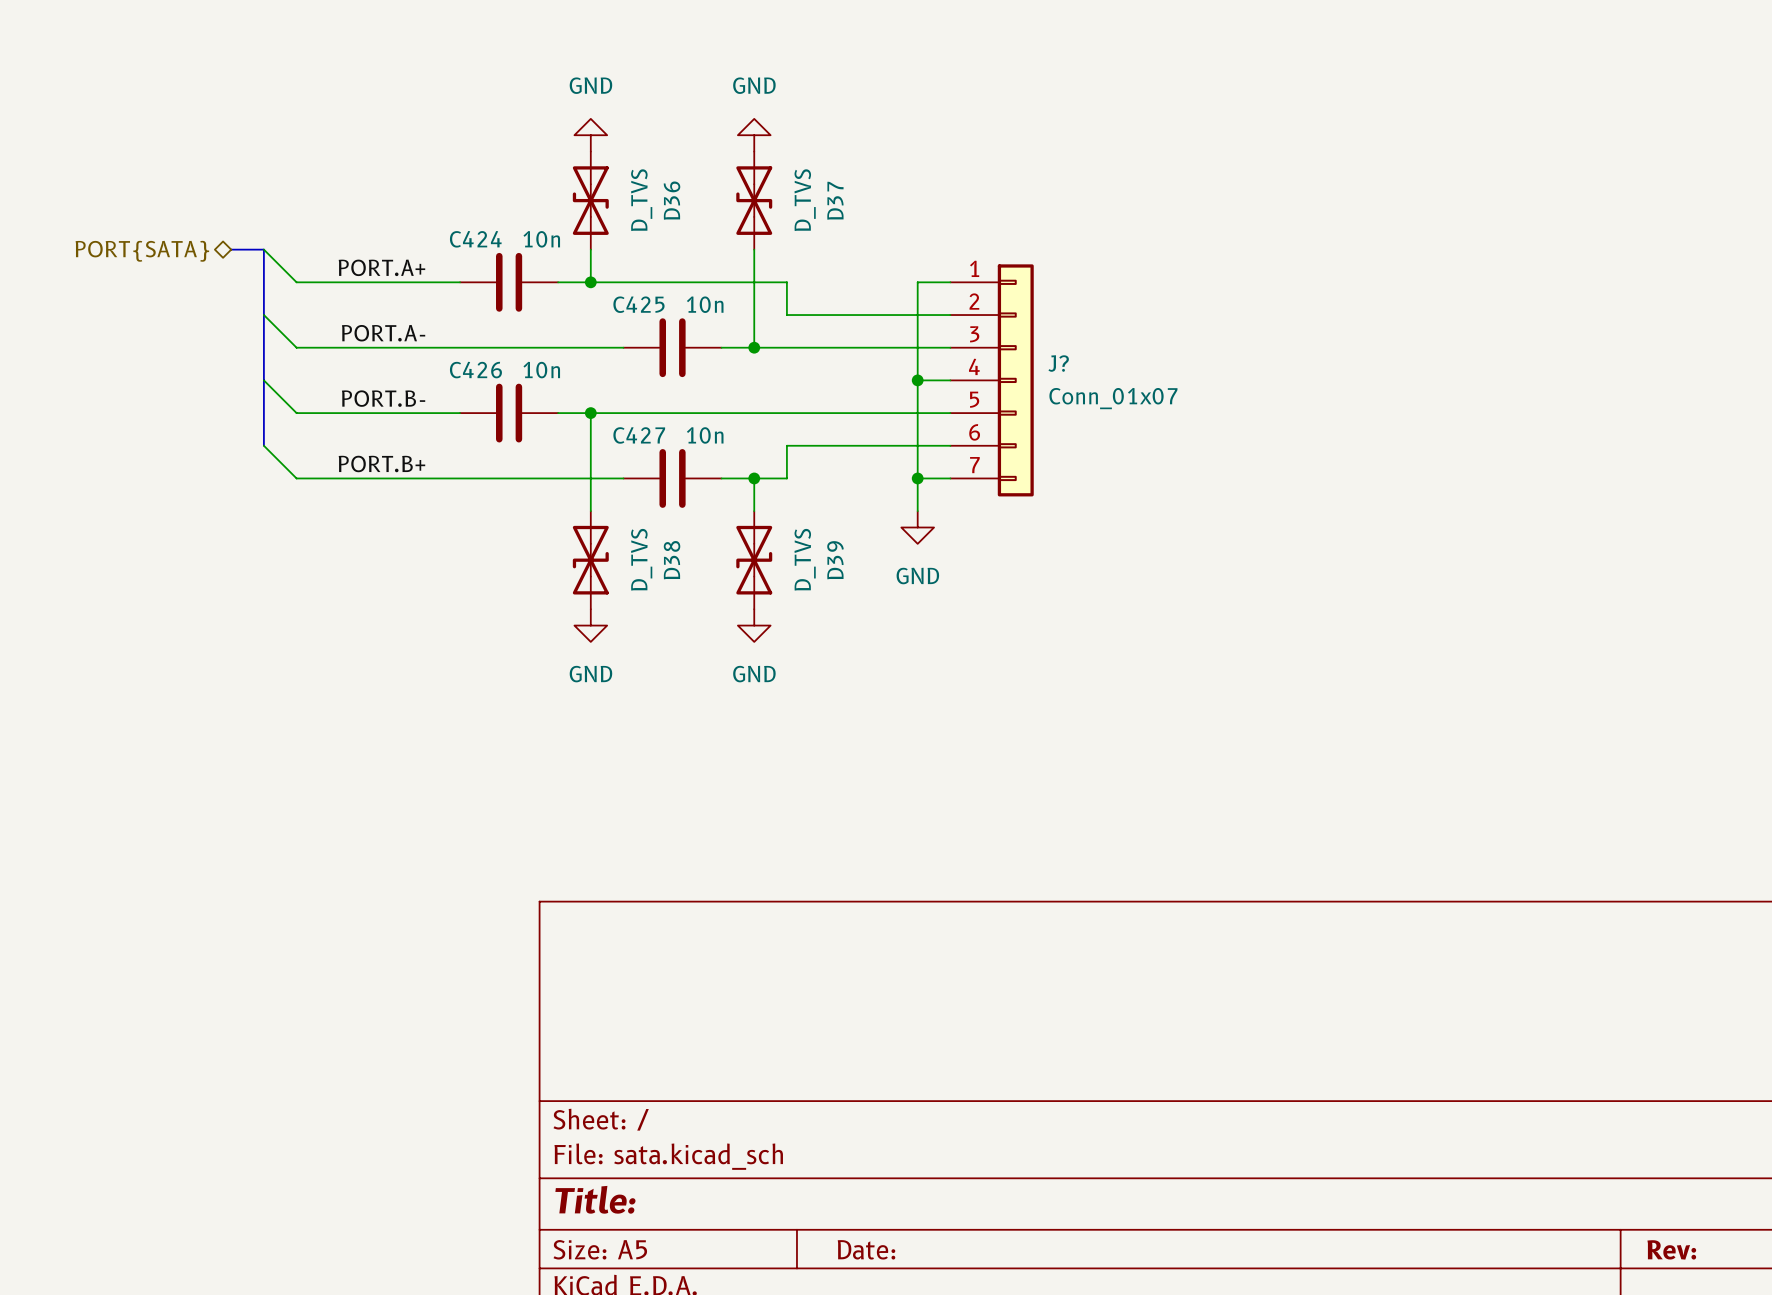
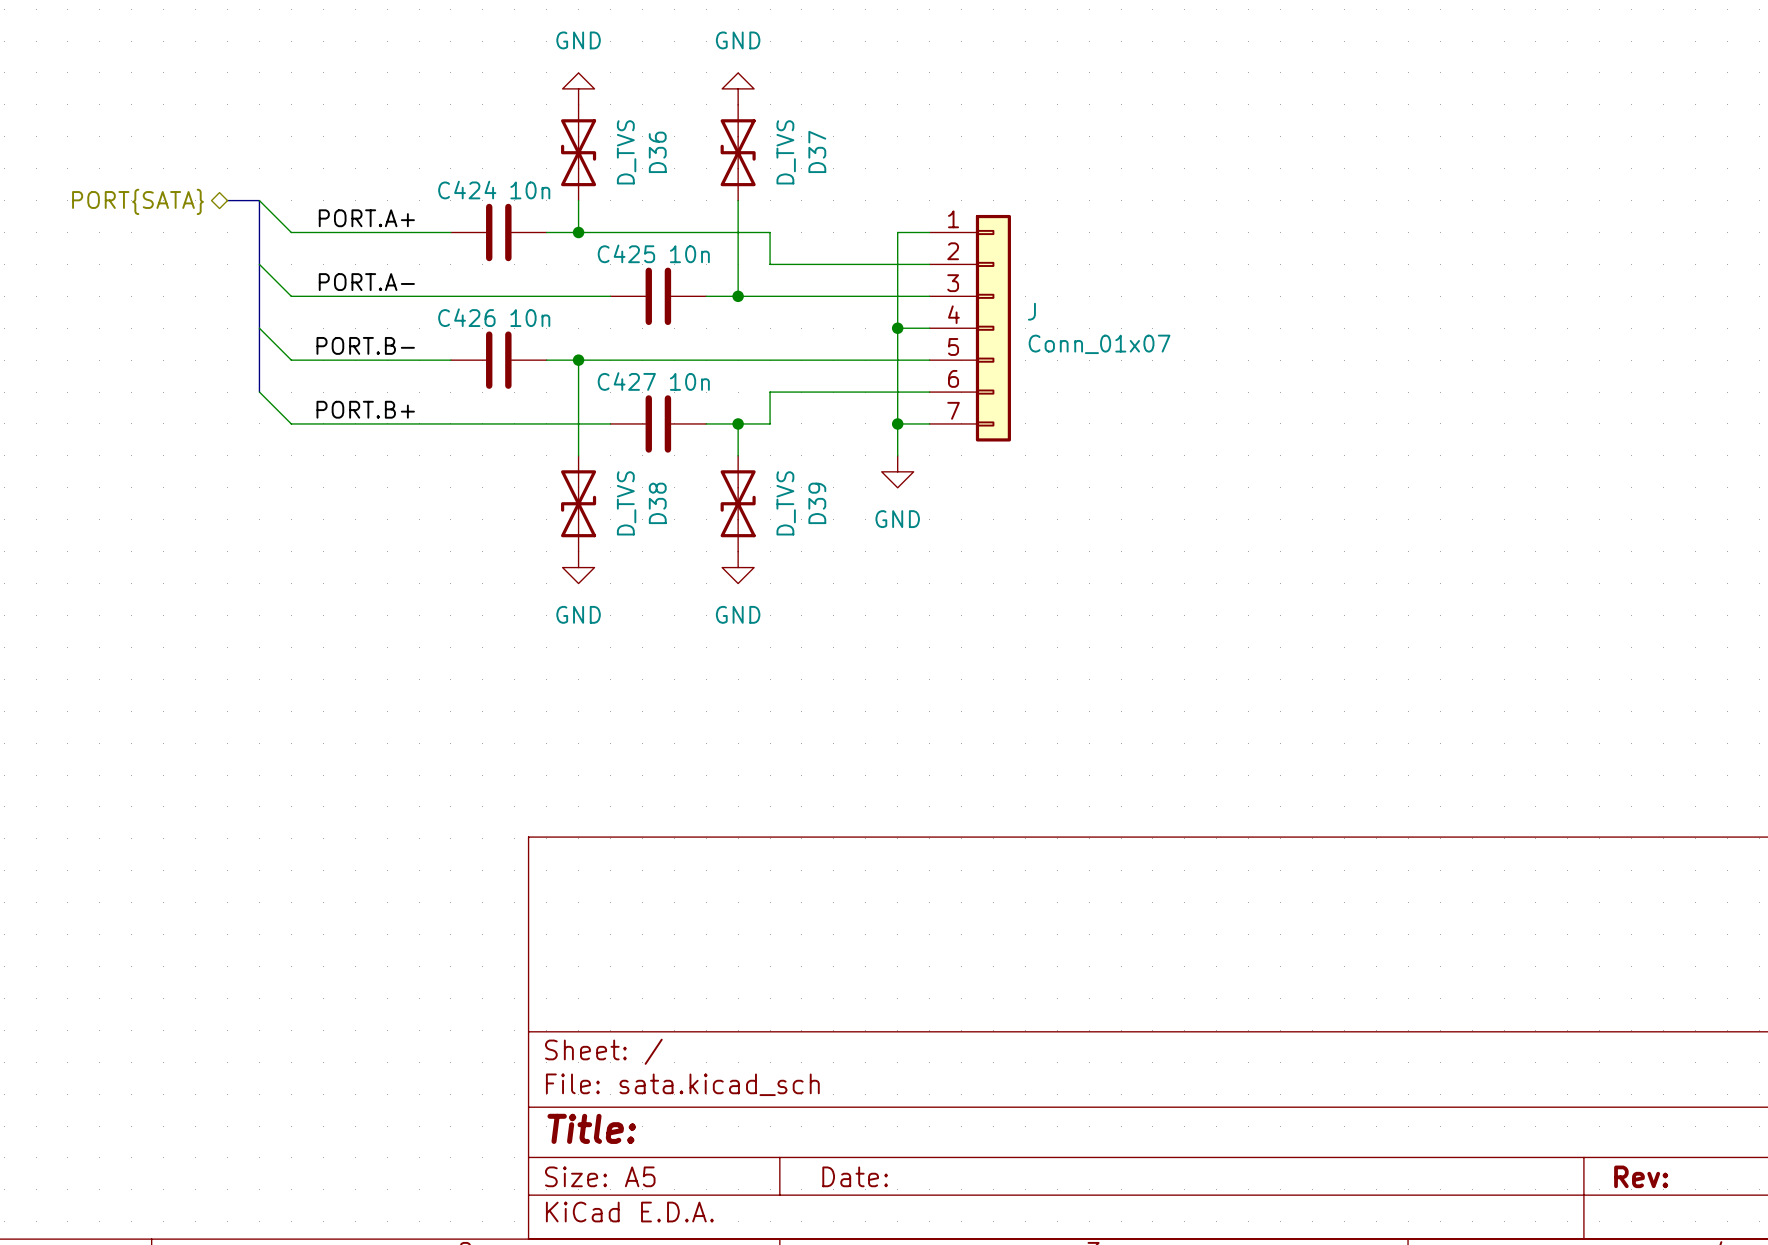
J? name: J? (1058, 363) -> J (1031, 311)

